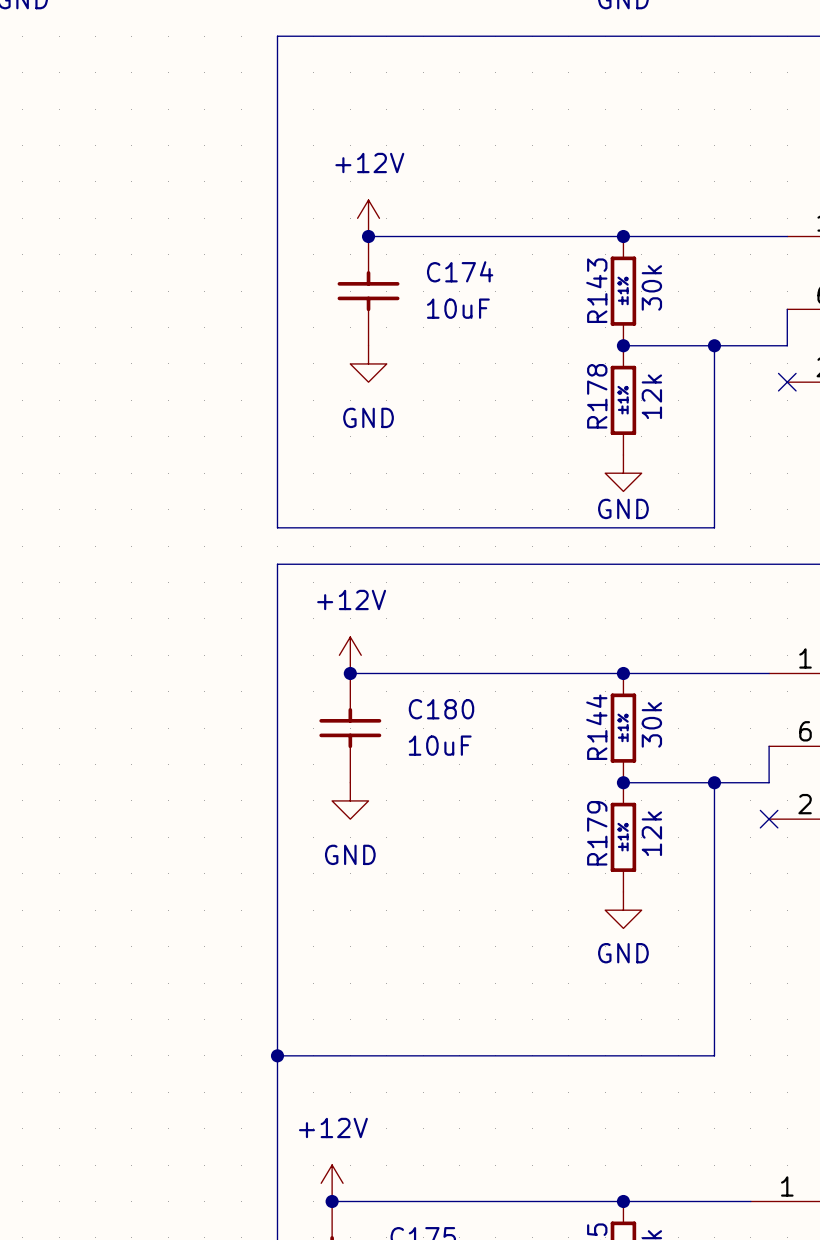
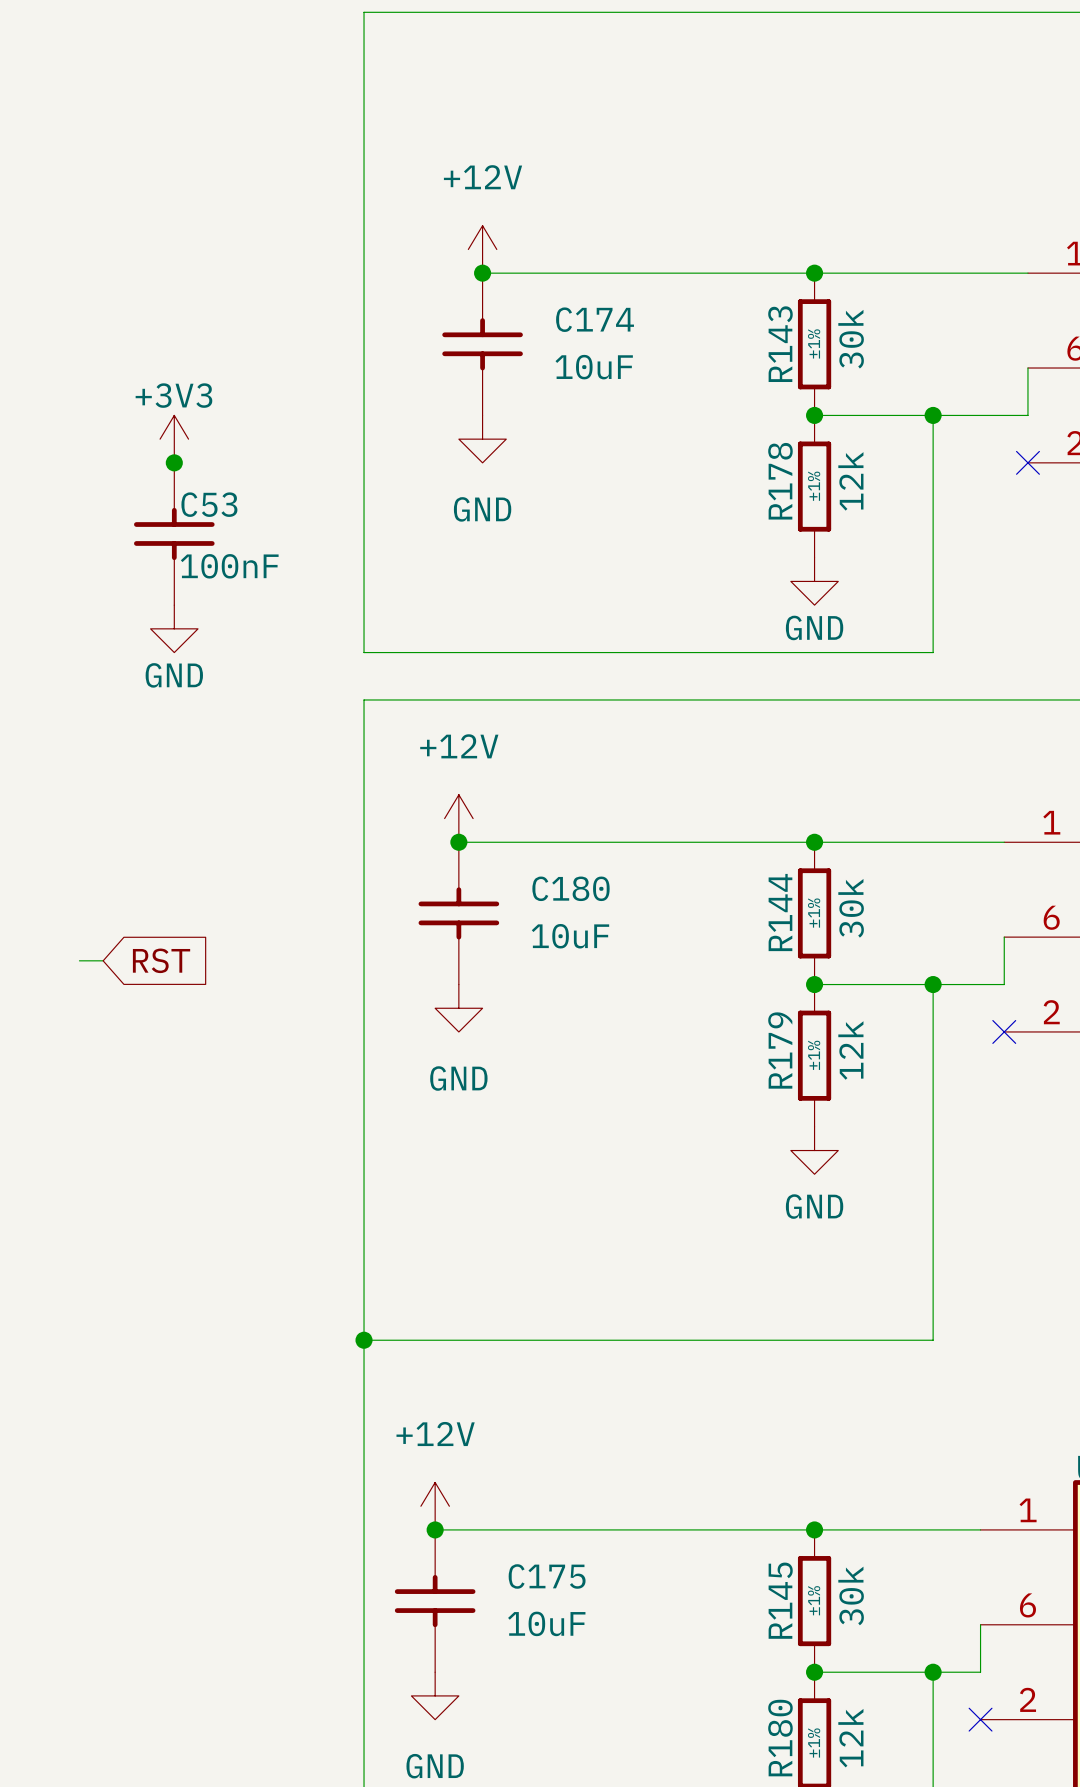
power symbol: none -> +3V3 (174, 439)
junction: none -> (174, 462)
C53: none -> (174, 534)
power symbol: none -> GND (174, 628)
wire: none -> (79, 960) (103, 960)
global label: none -> RST (161, 960)

